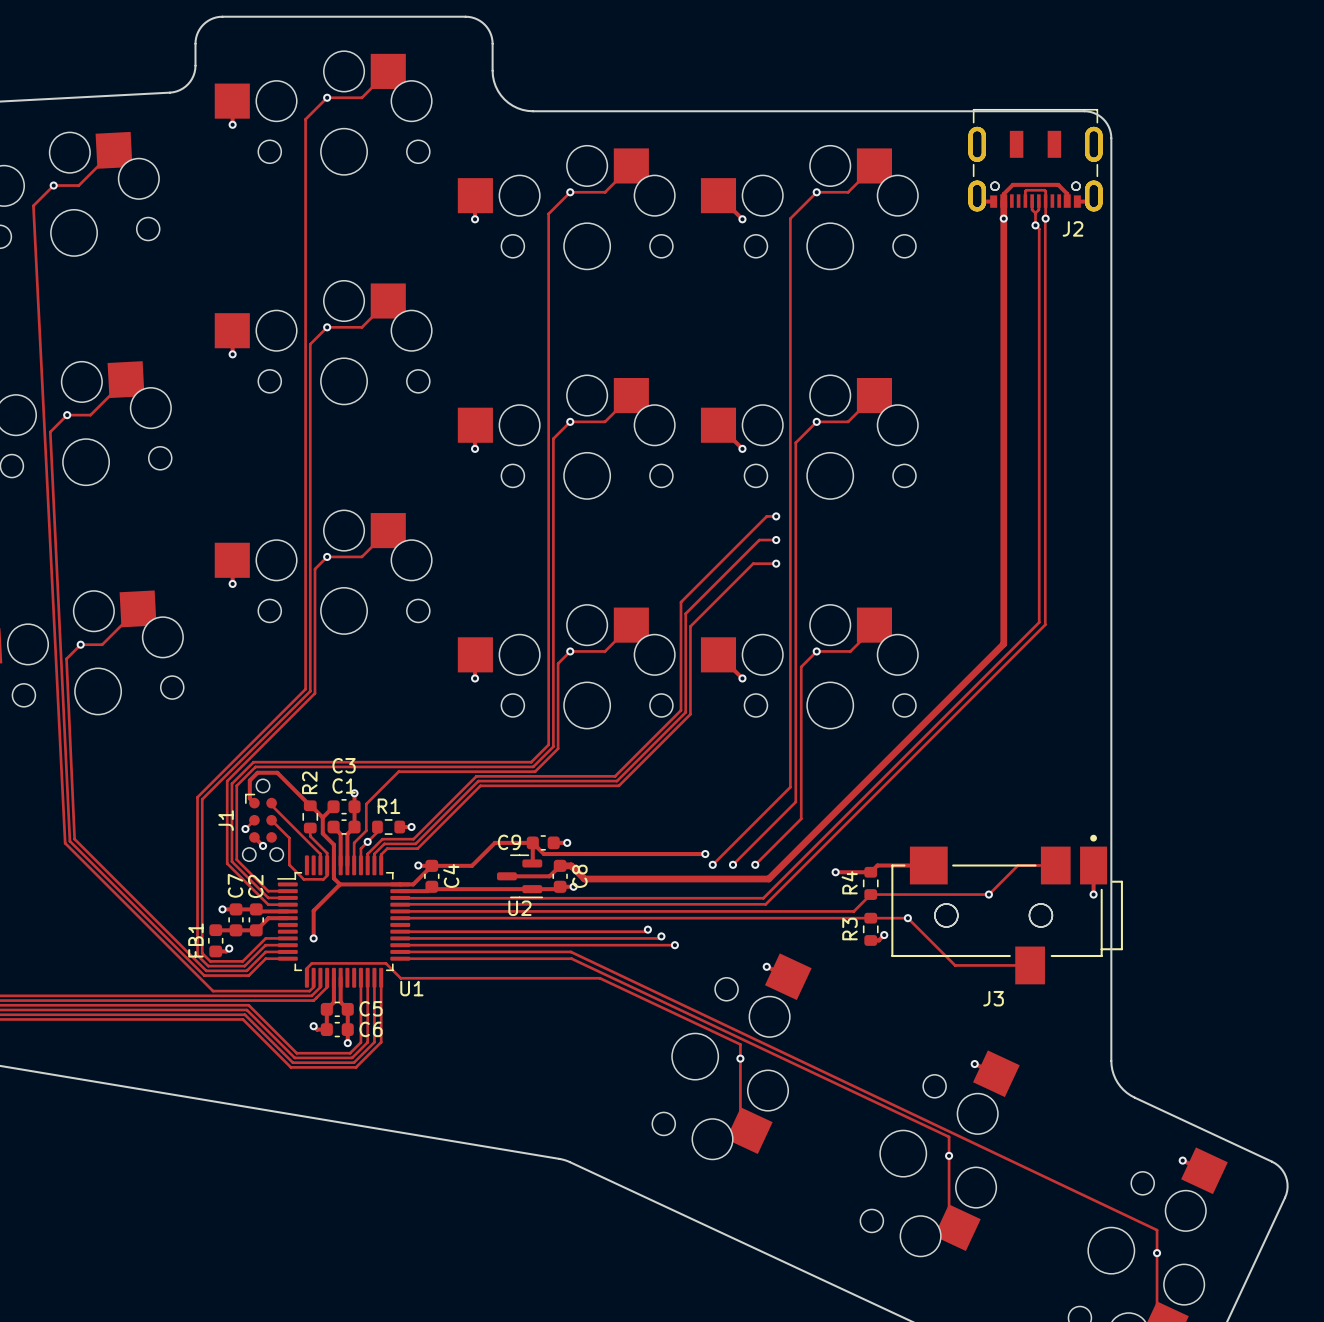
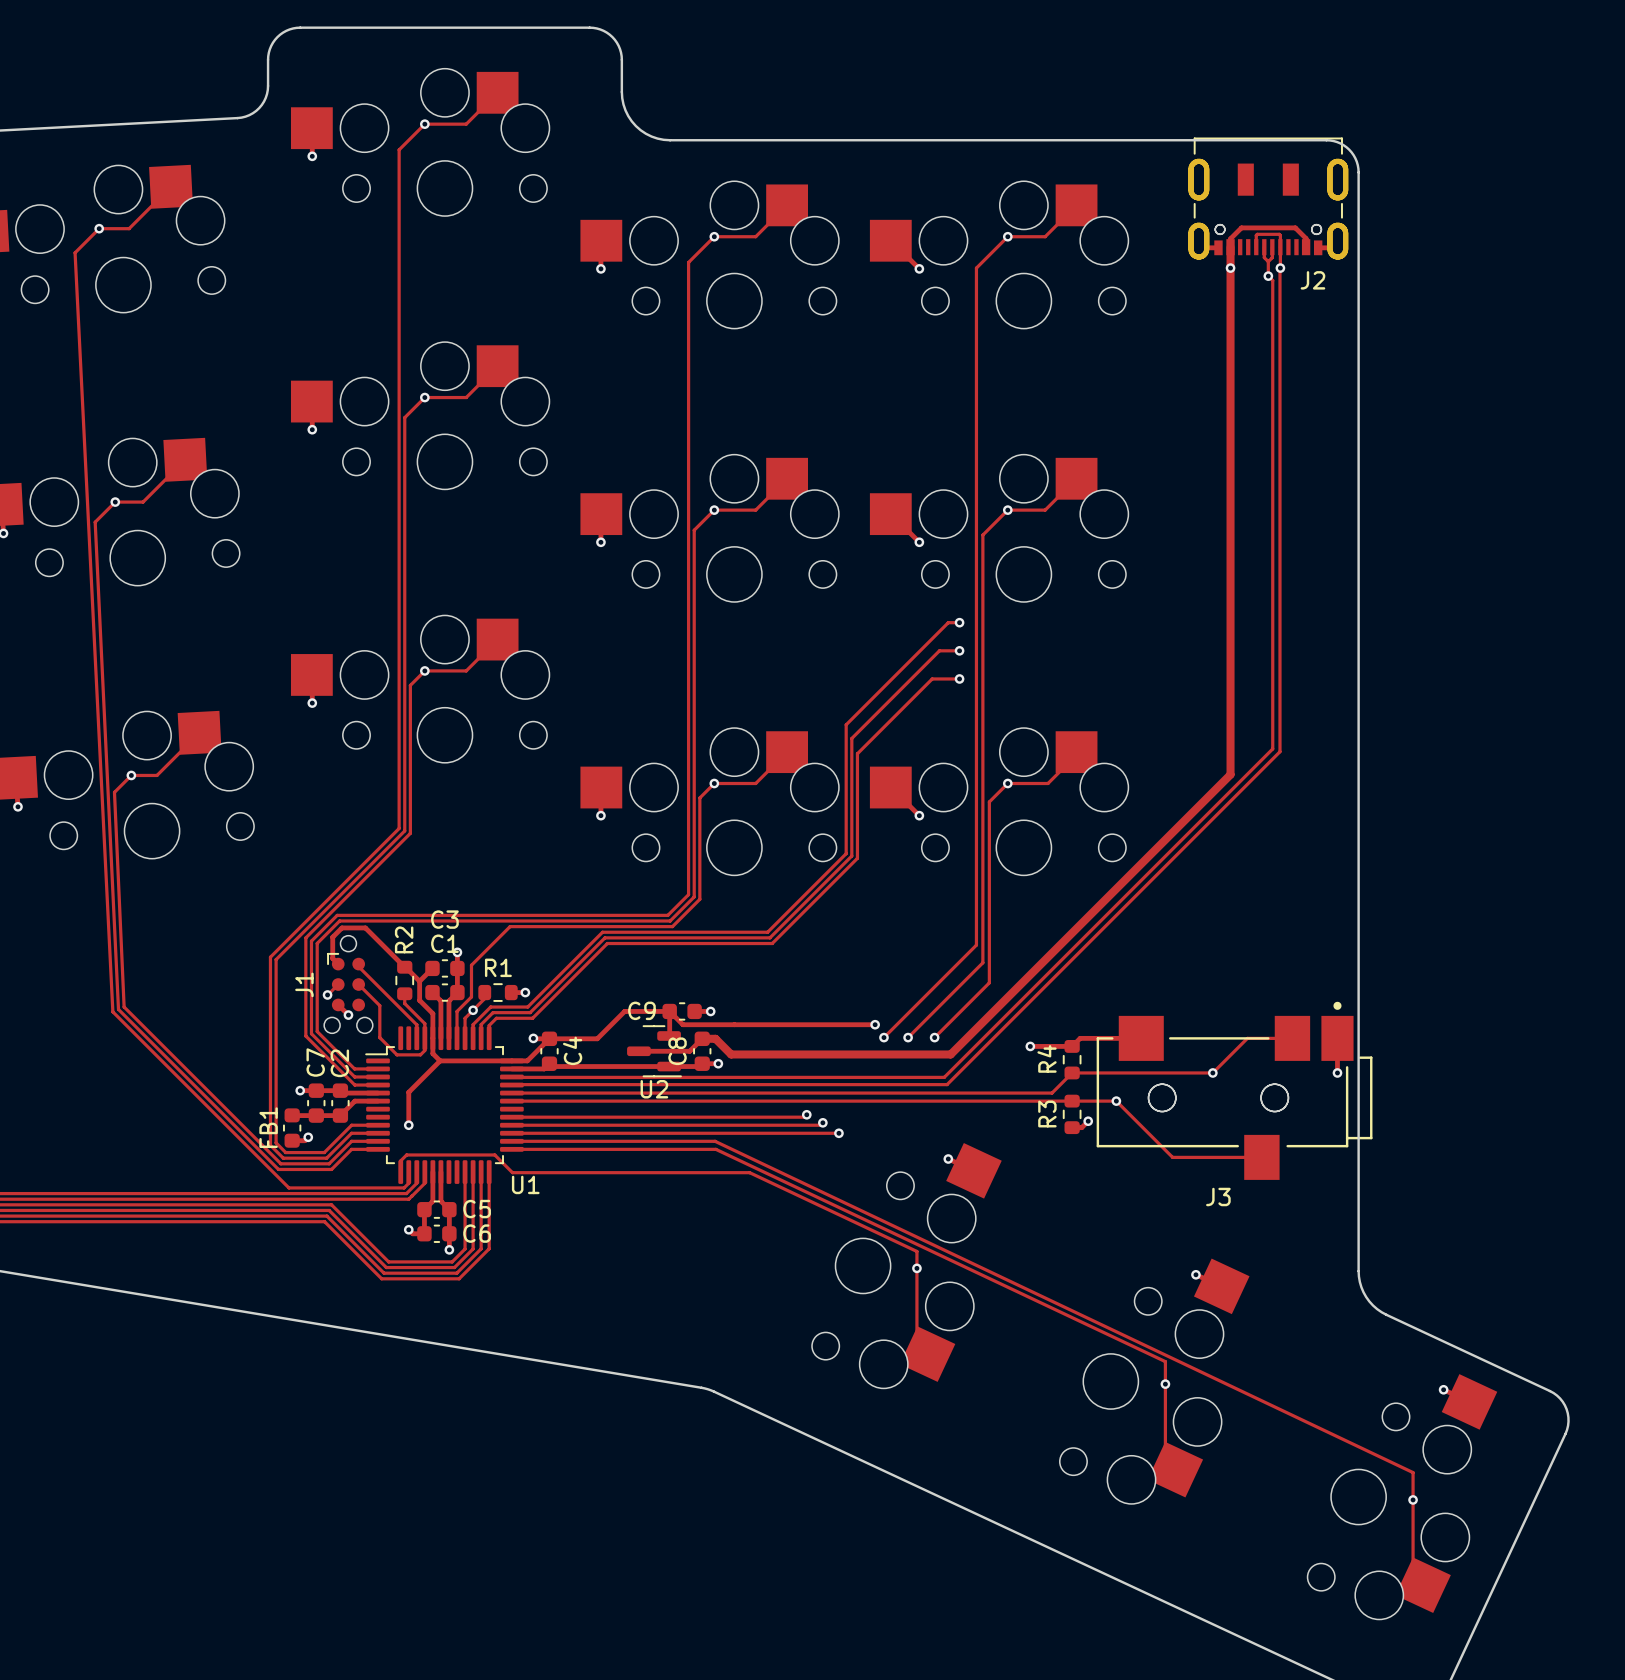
C8 name position: C8 (579, 876) -> C8 (677, 1051)

